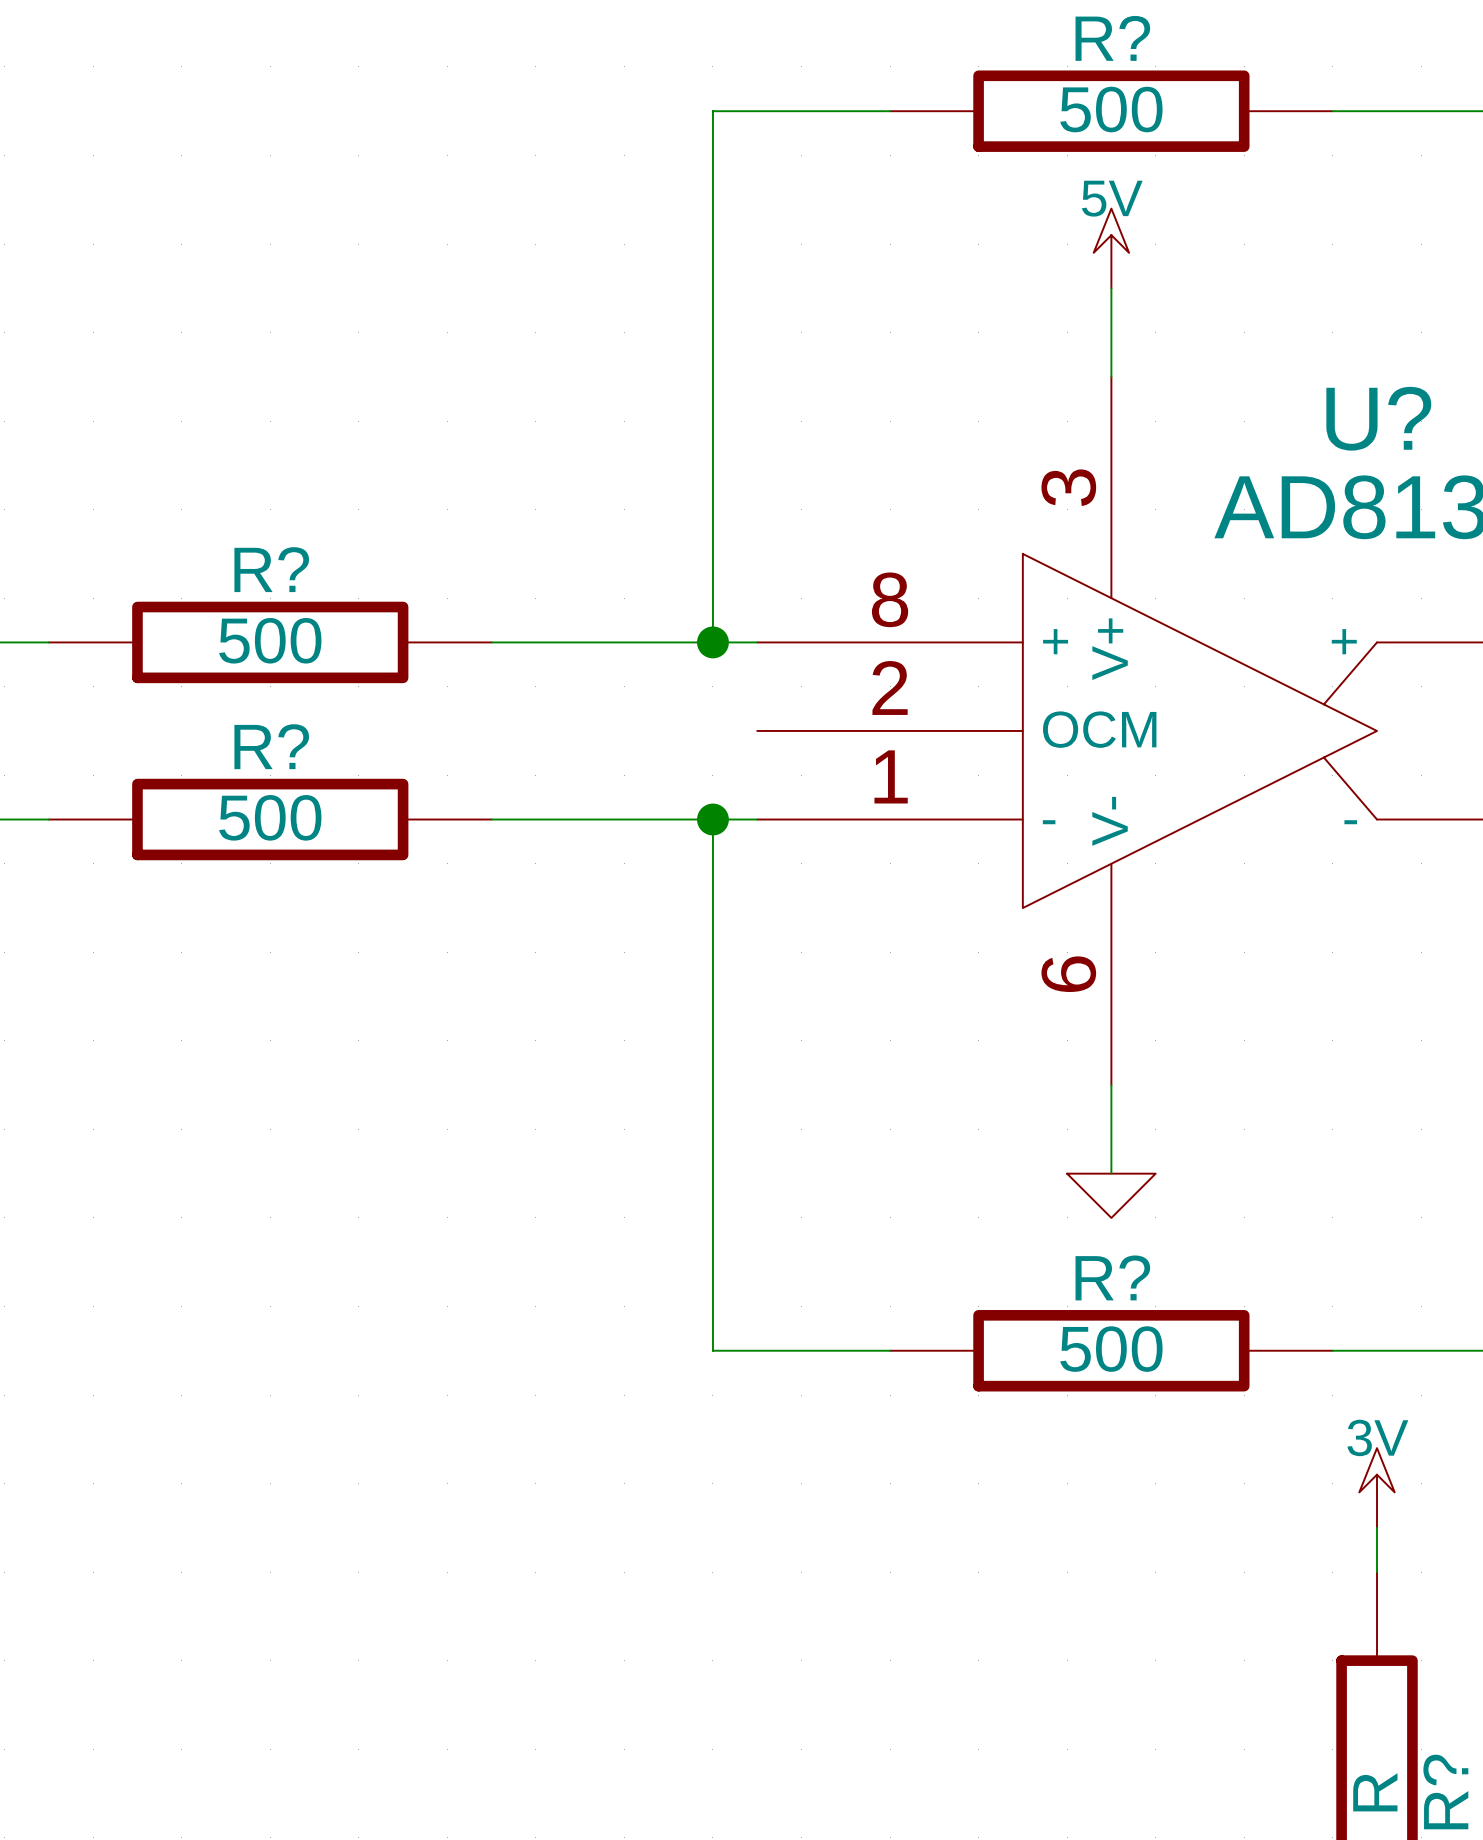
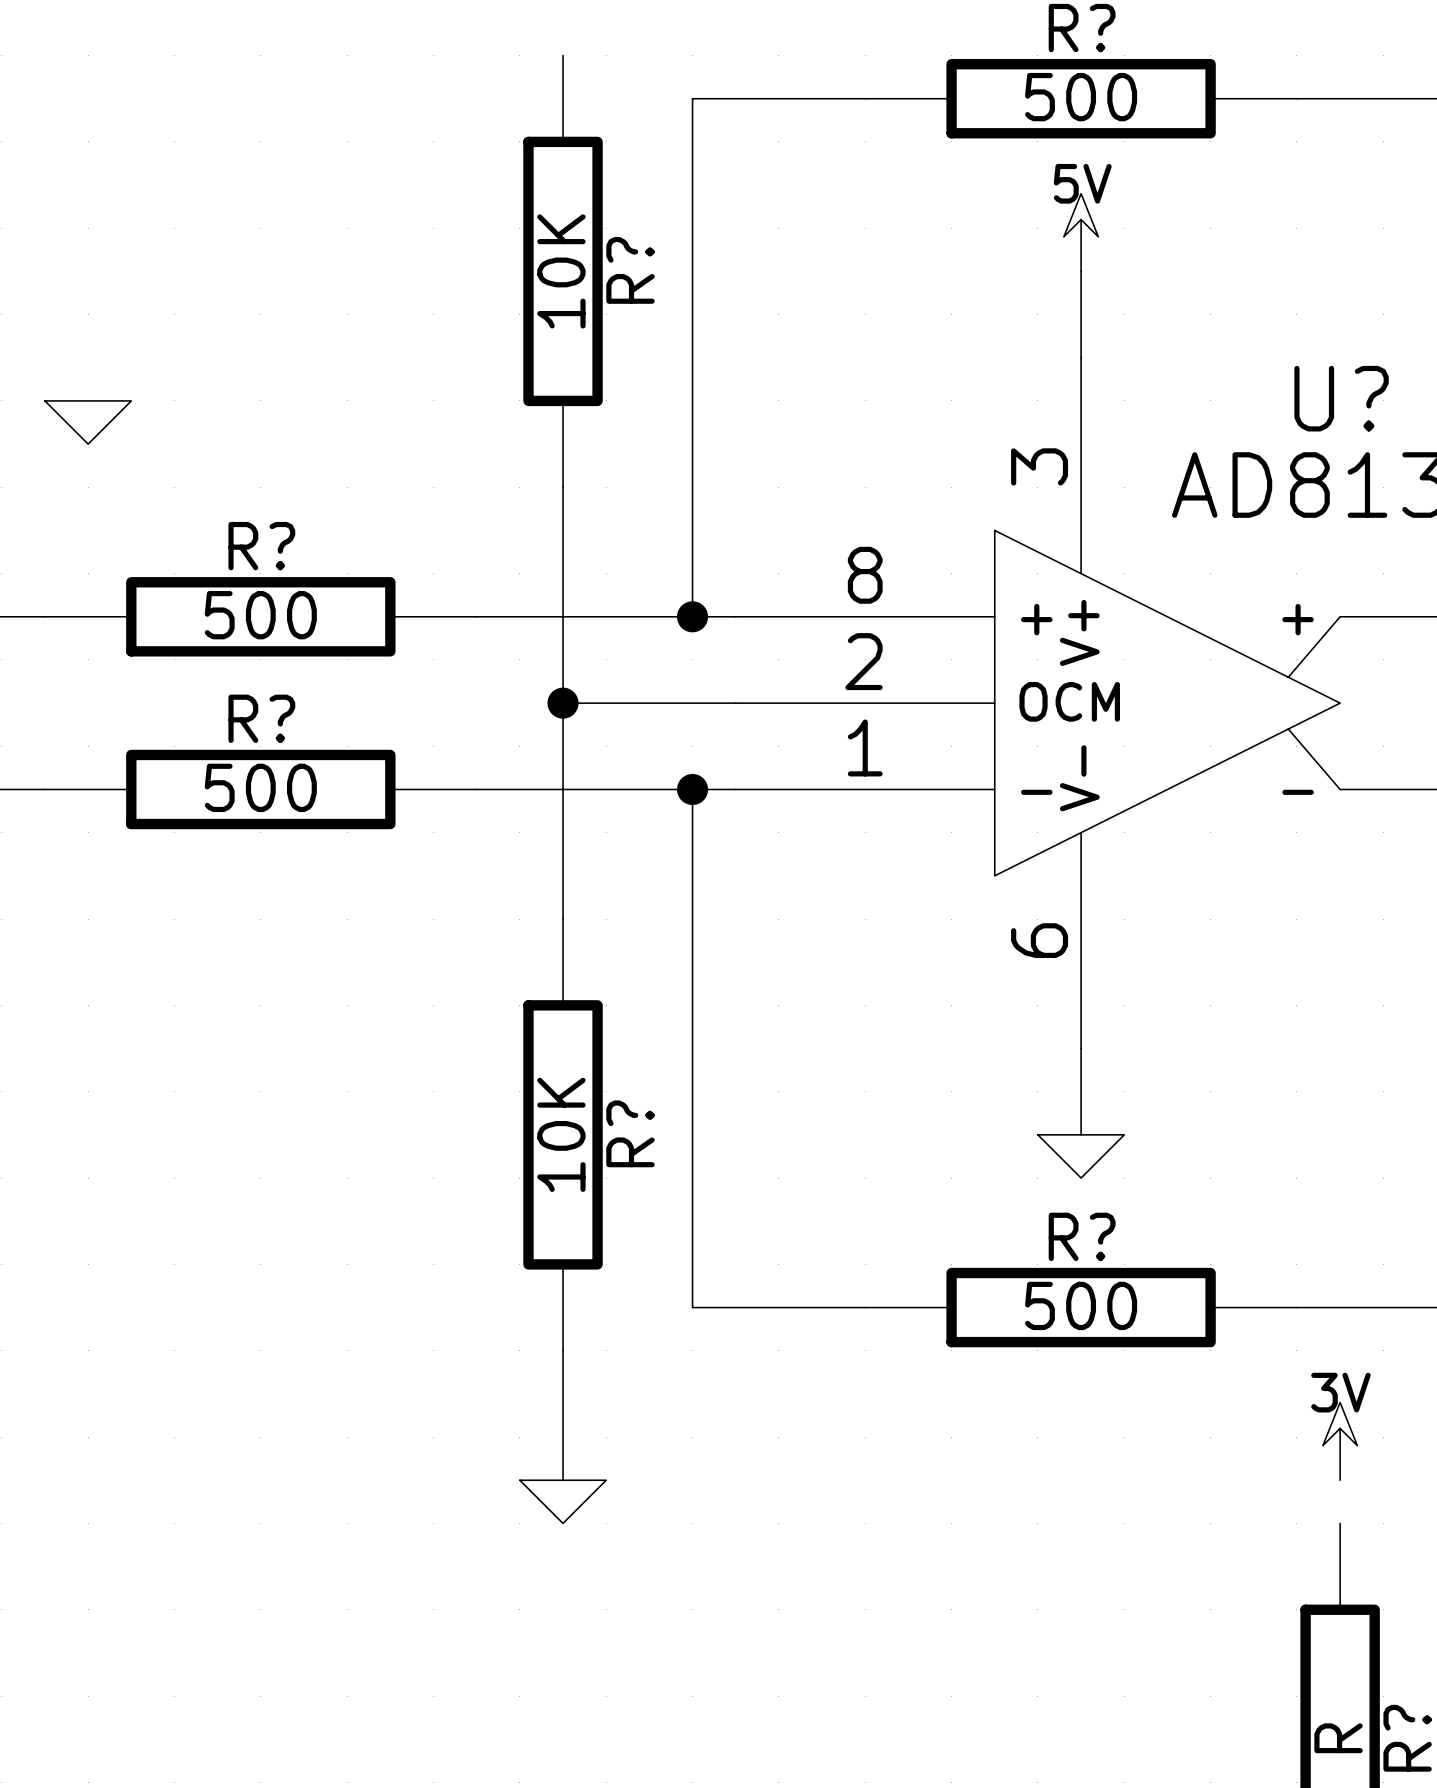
R?: none -> 10K (563, 271)
power symbol: none -> (88, 422)
wire: none -> (563, 487) (563, 919)
wire: none -> (563, 703) (735, 703)
junction: none -> (563, 703)
R?: none -> 10K (563, 1134)
wire: none -> (563, 1350) (563, 1480)
wire: (1377, 1527) (1377, 1572) -> none
power symbol: none -> (563, 1501)

